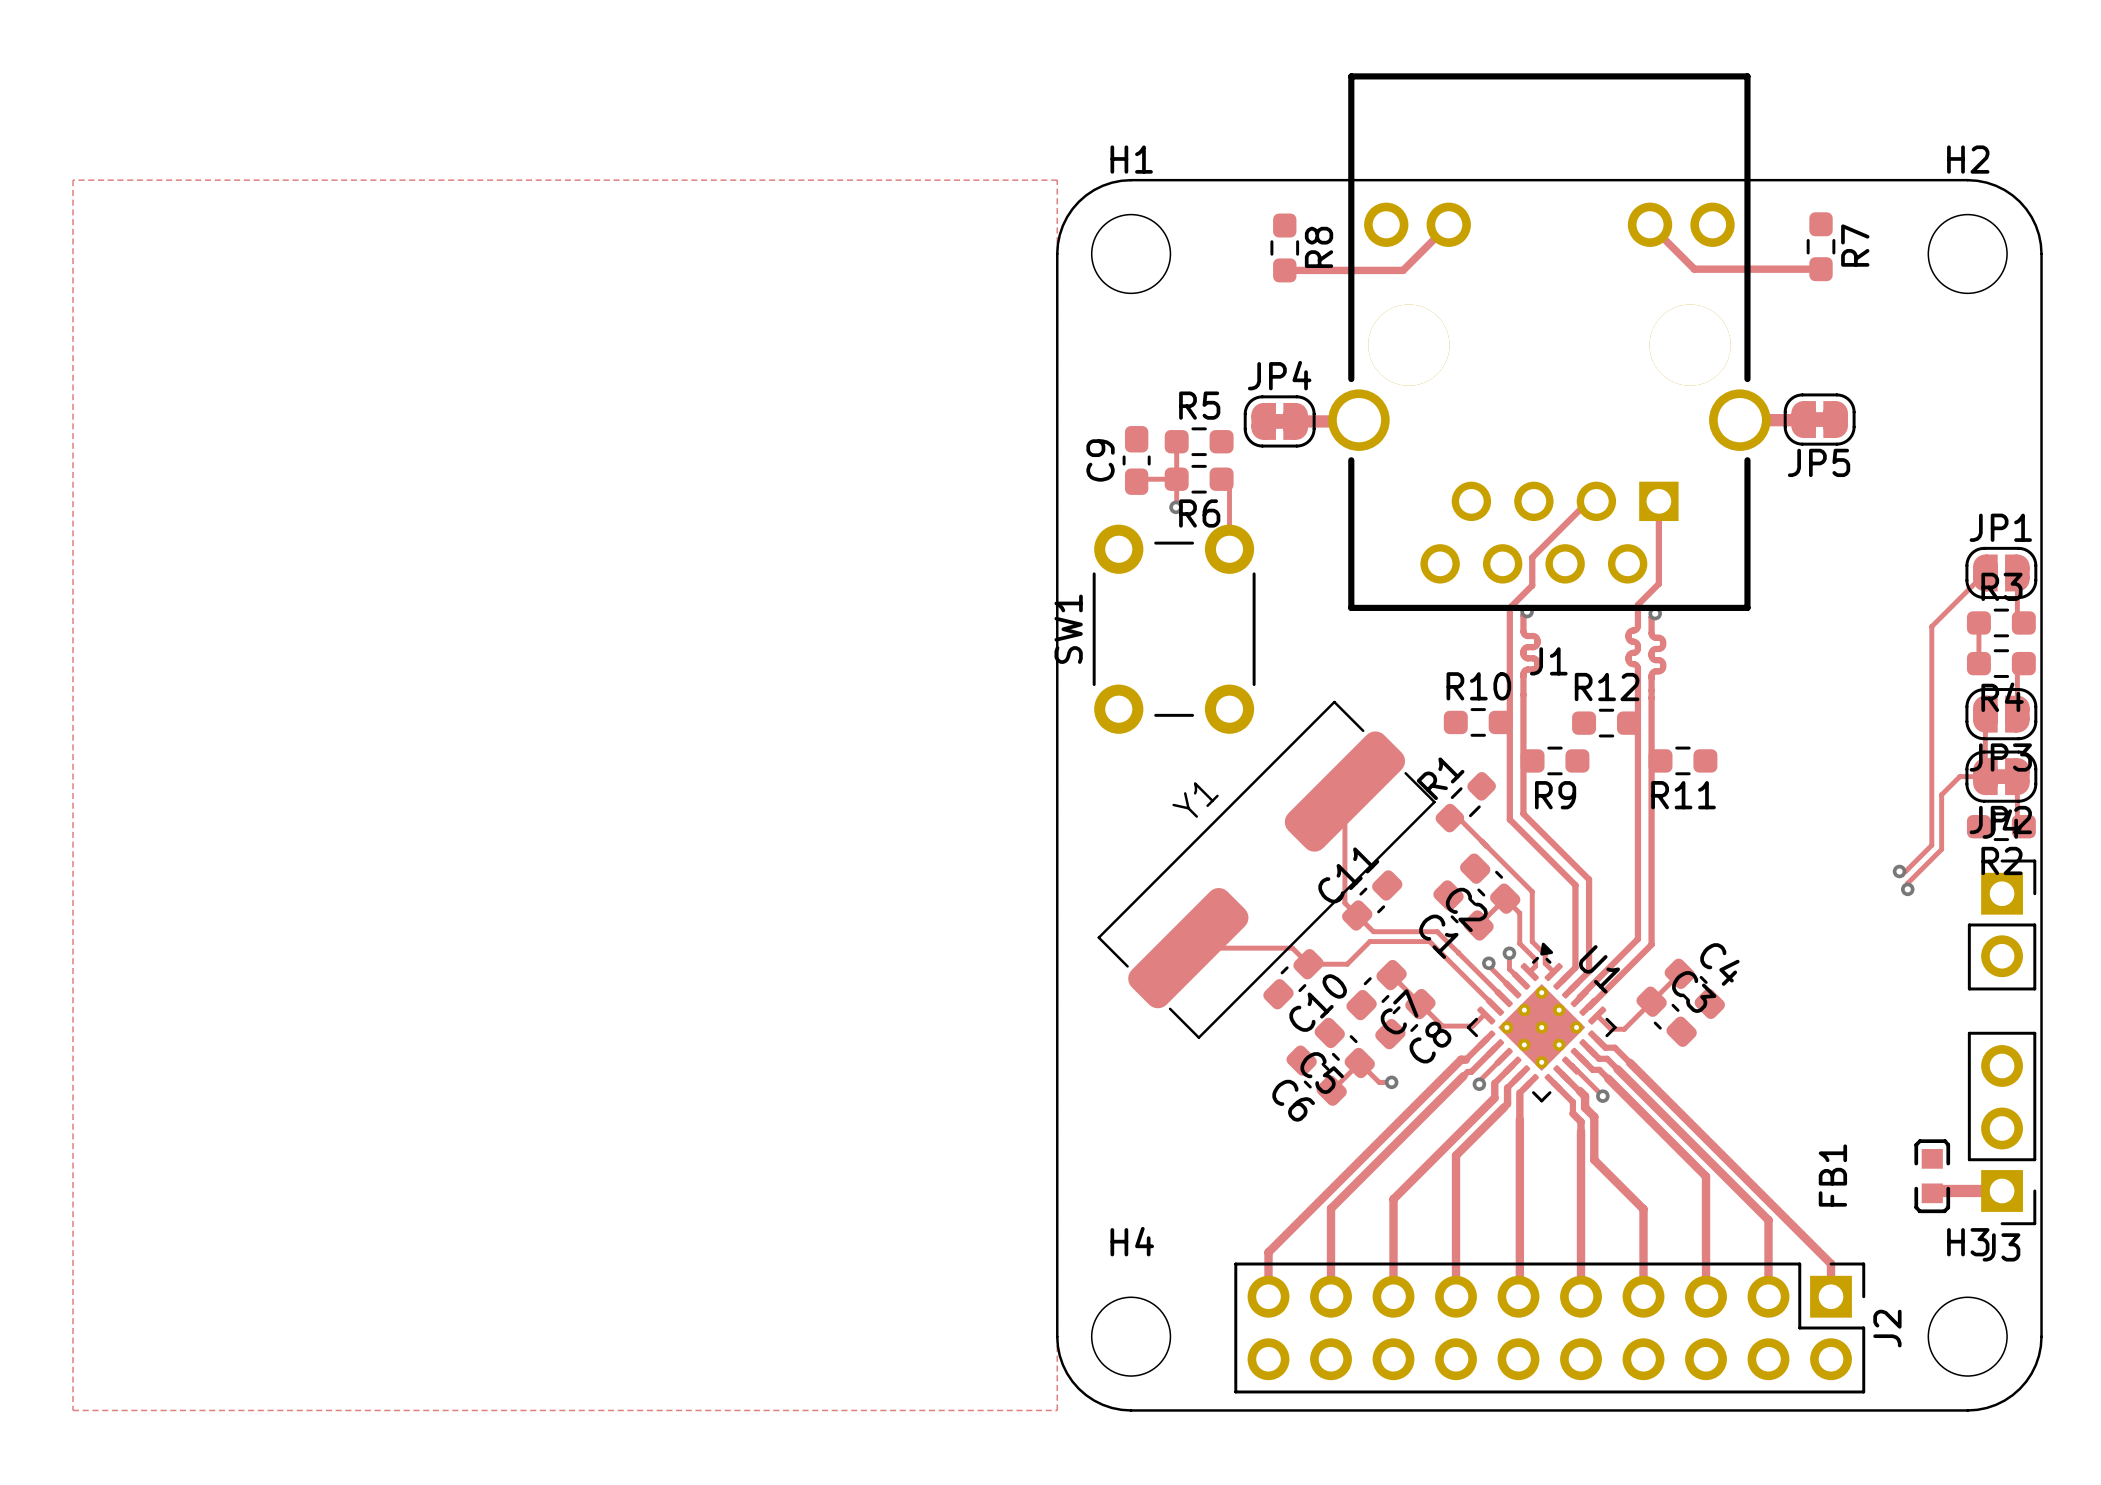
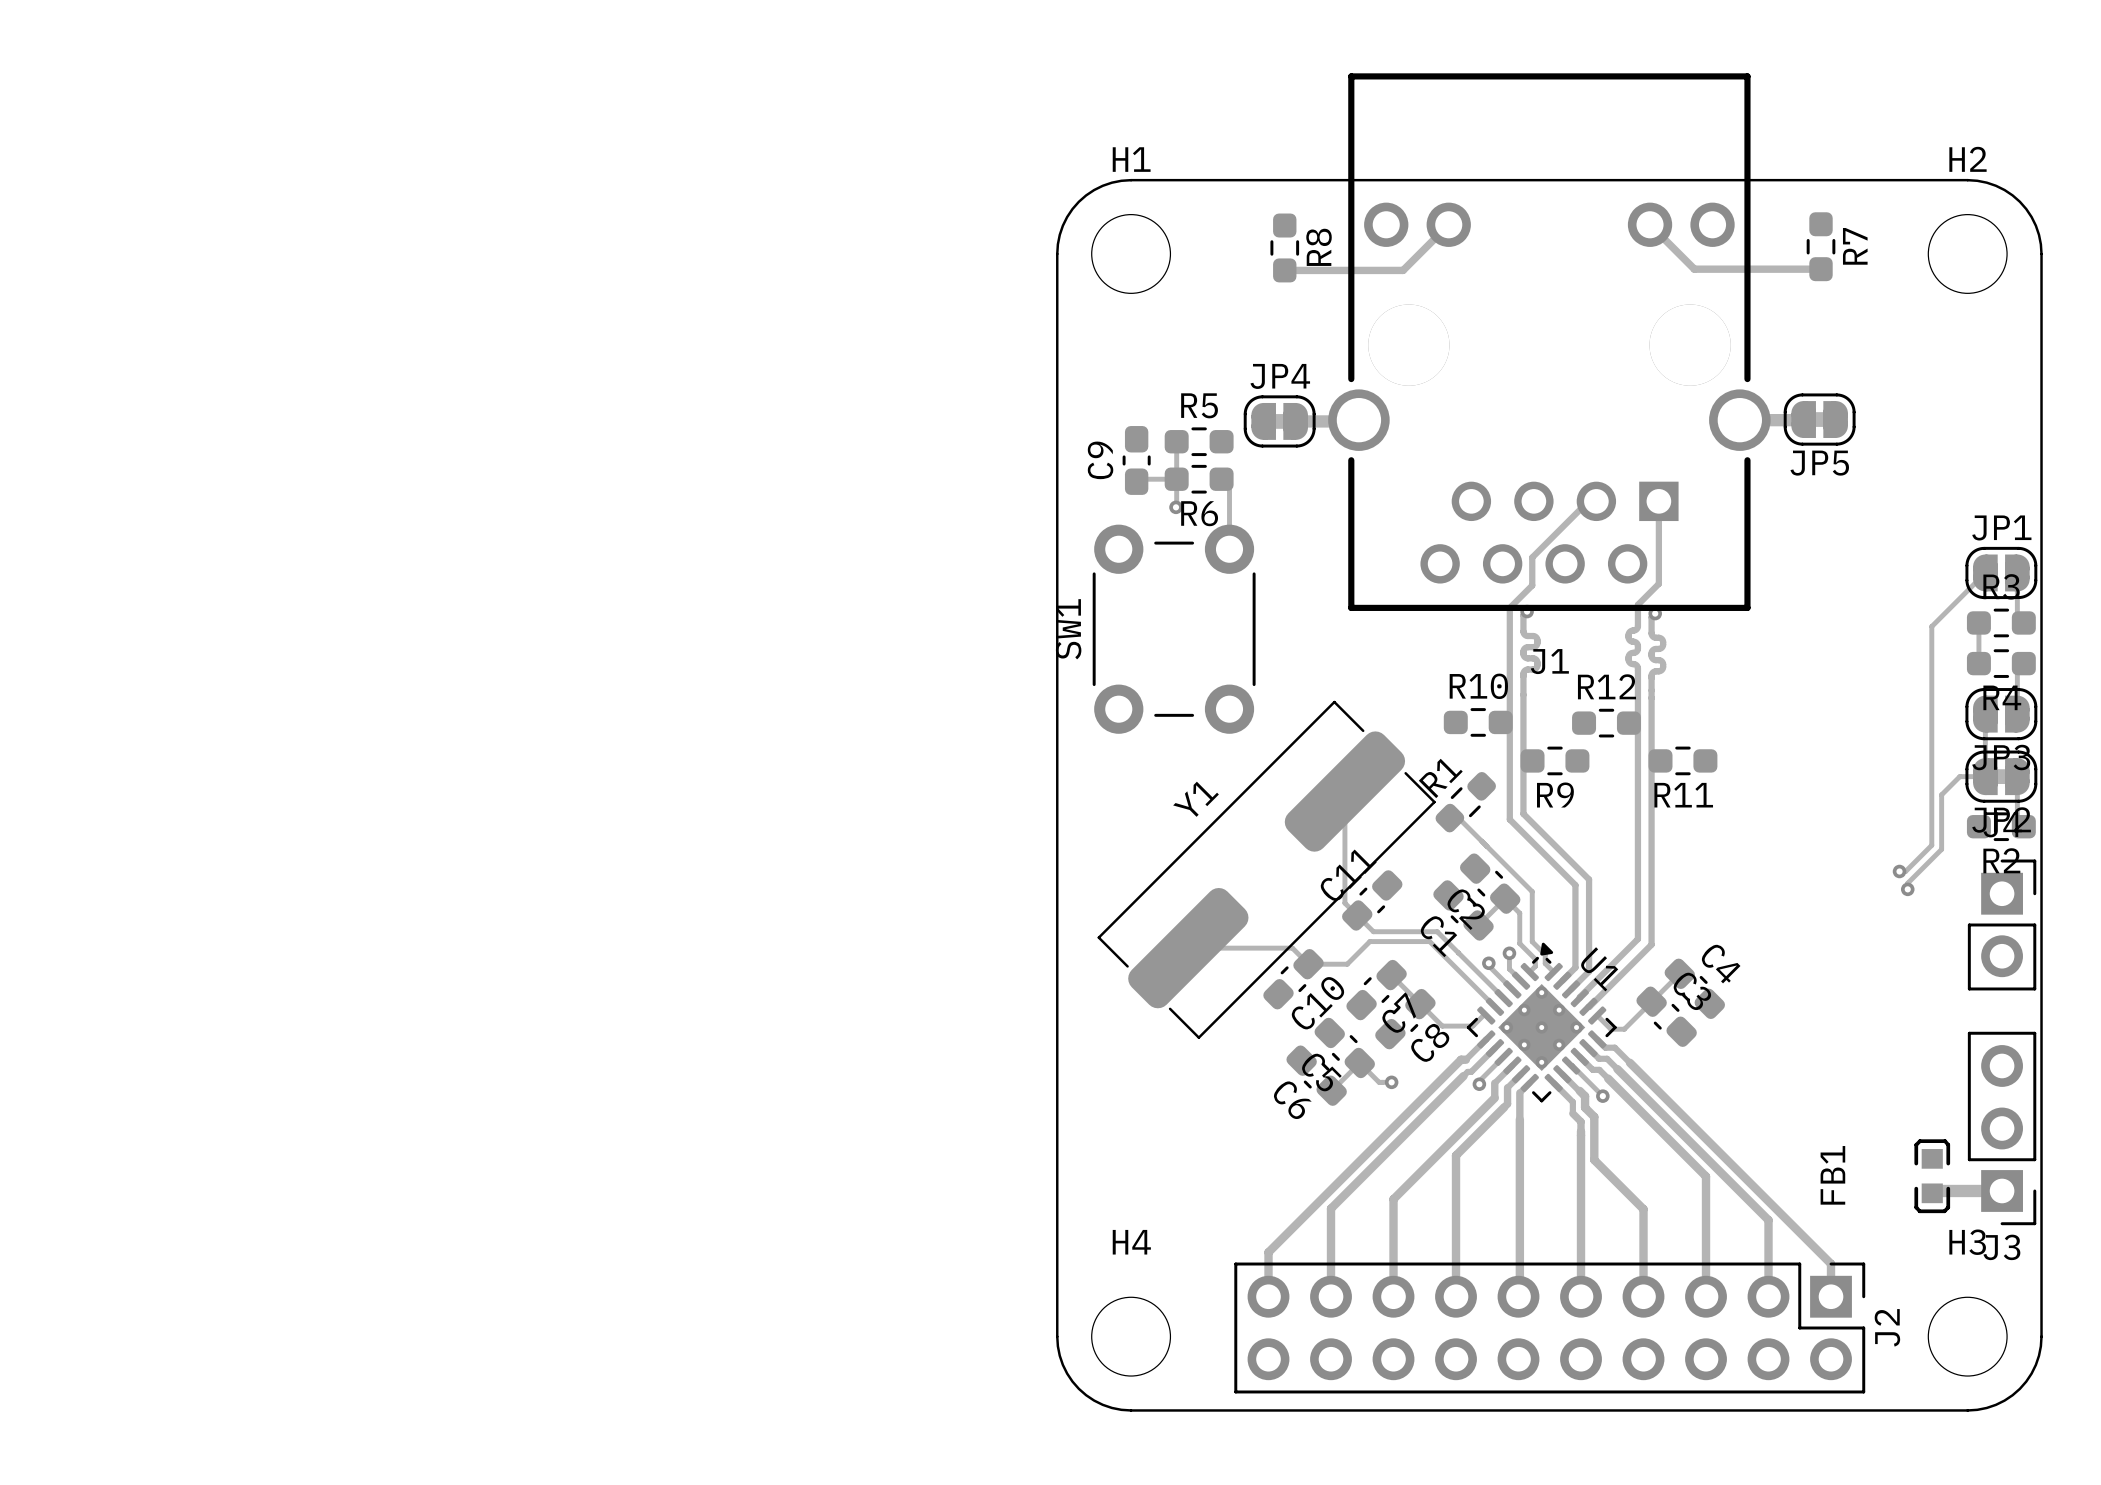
zone outline: (73, 180) (1057, 180) (1057, 1410) (73, 1410) (73, 180) -> none

